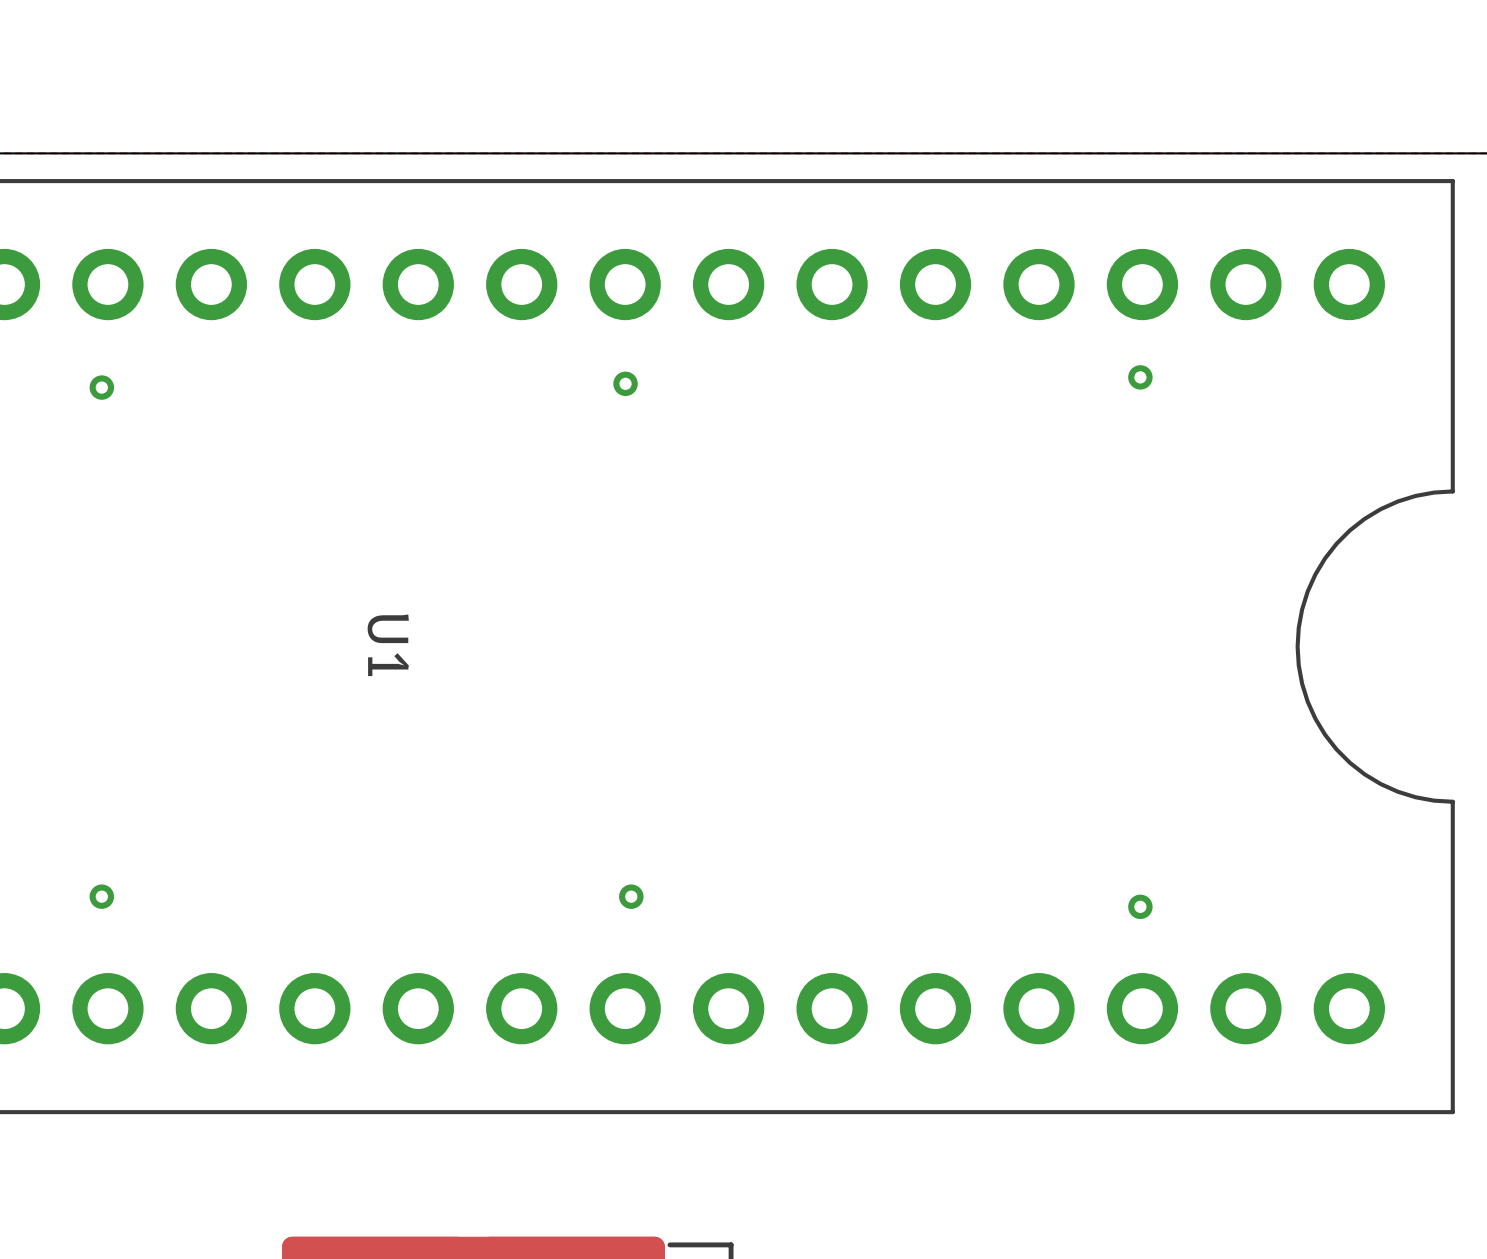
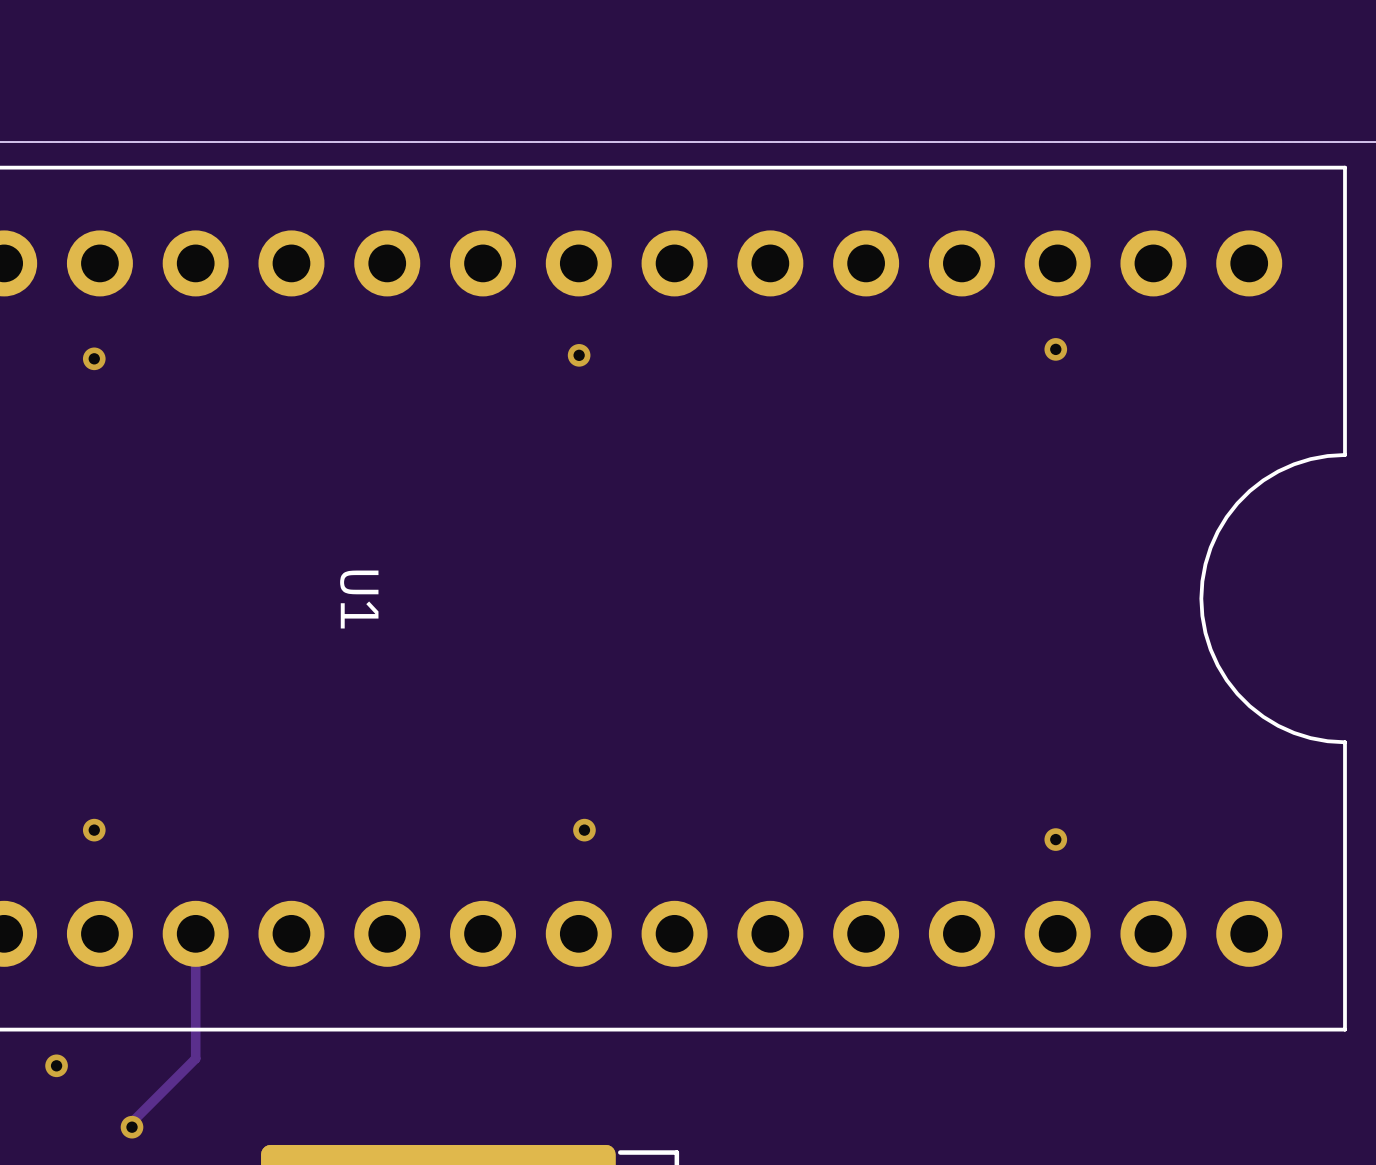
track: none -> (195, 933) (195, 1058) (132, 1122) (132, 1127)
via: none -> (56, 1065)
via: none -> (132, 1127)

